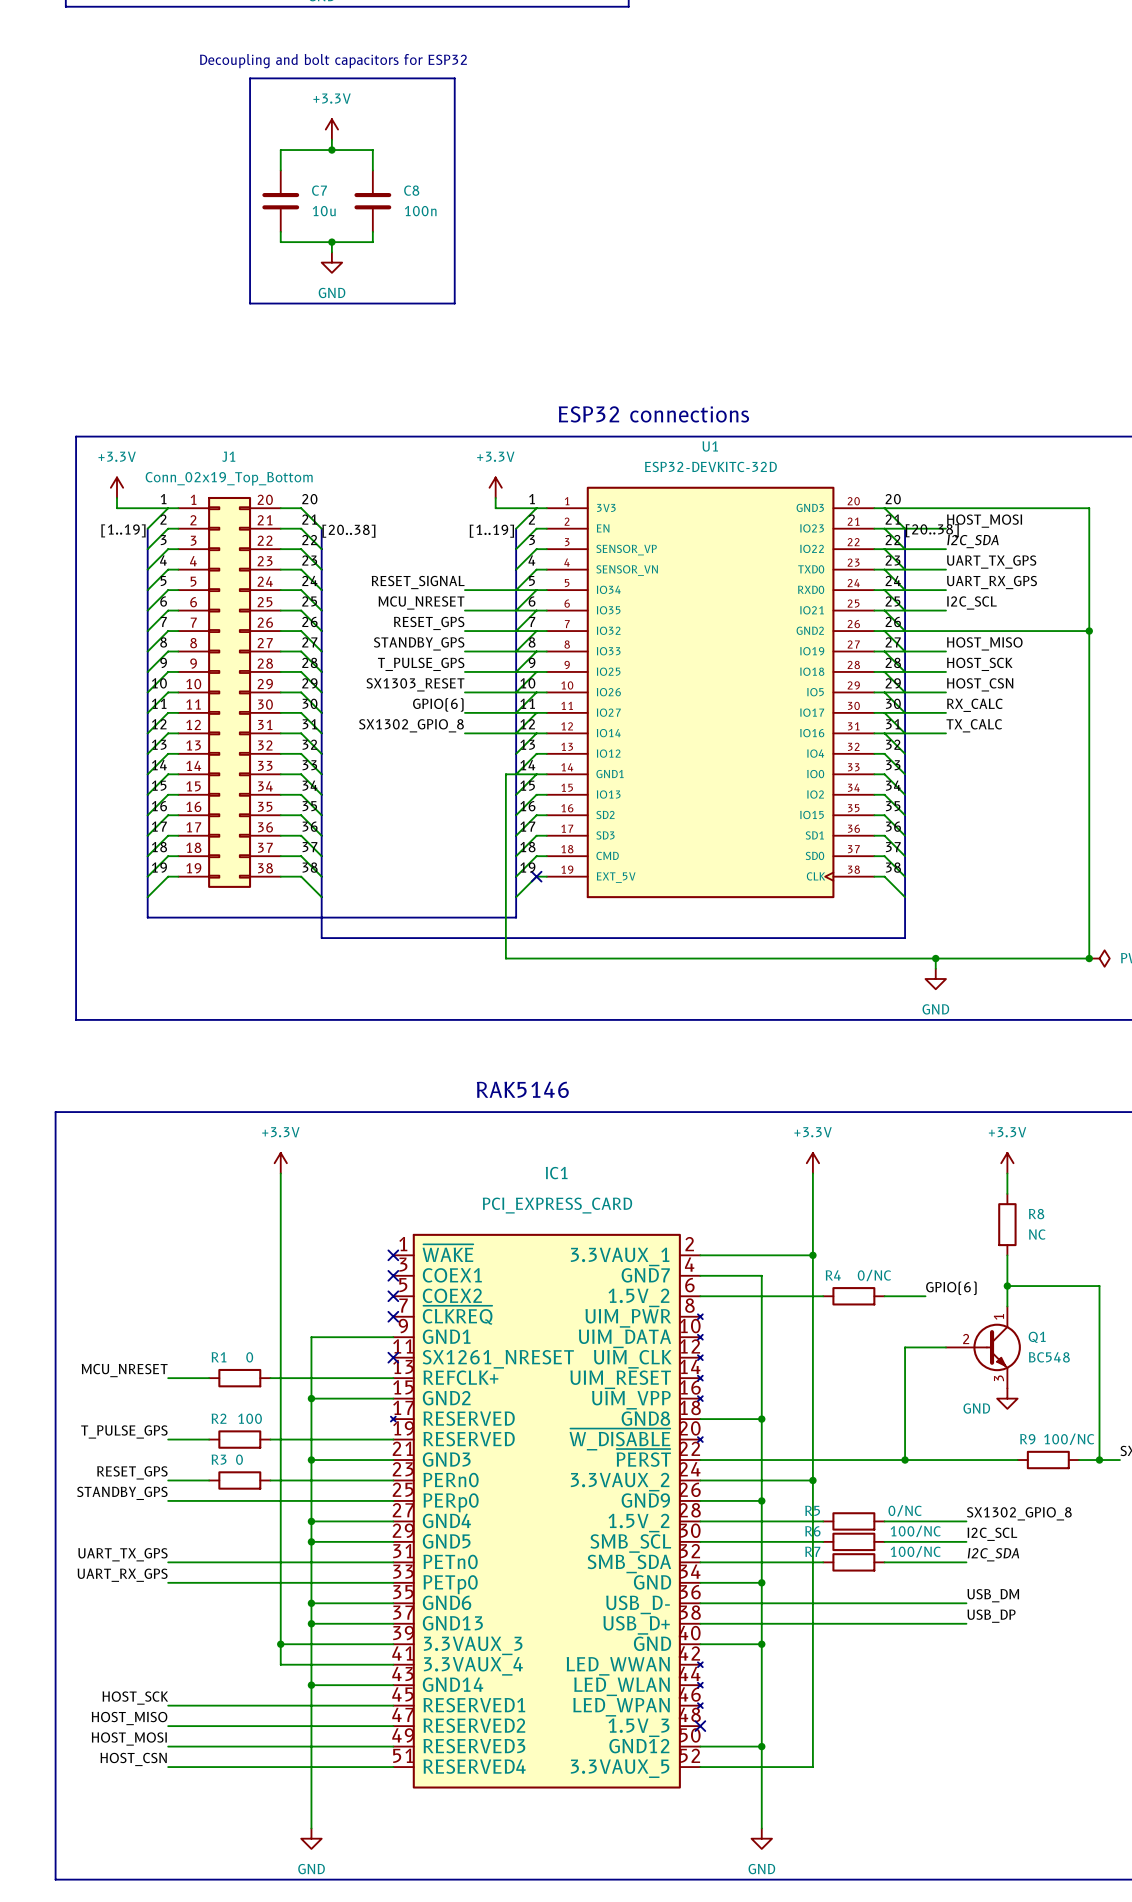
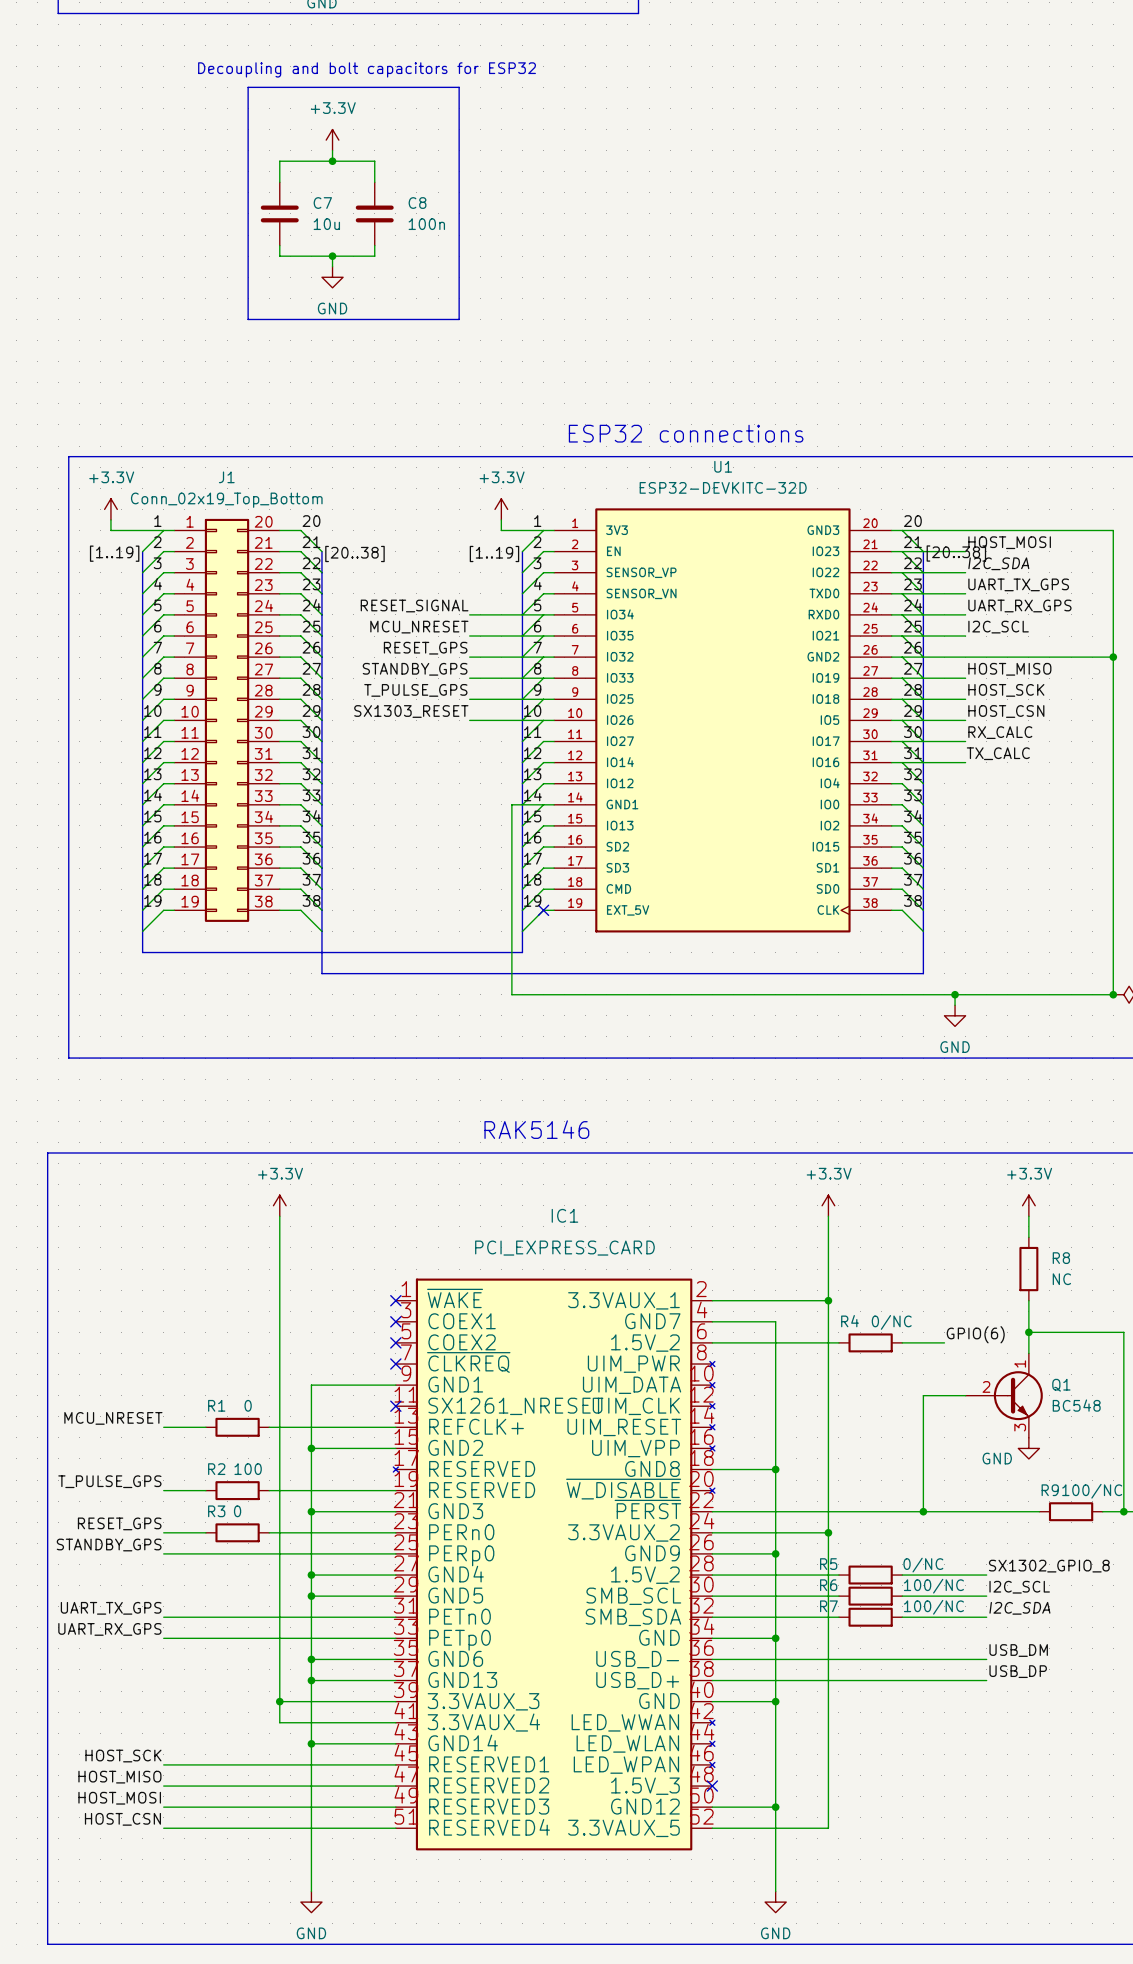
label: GPIO(6) (438, 704) -> none
wire: (464, 712) (536, 712) -> none
label: SX1302_GPIO_8 (411, 725) -> none
wire: (464, 733) (536, 733) -> none

